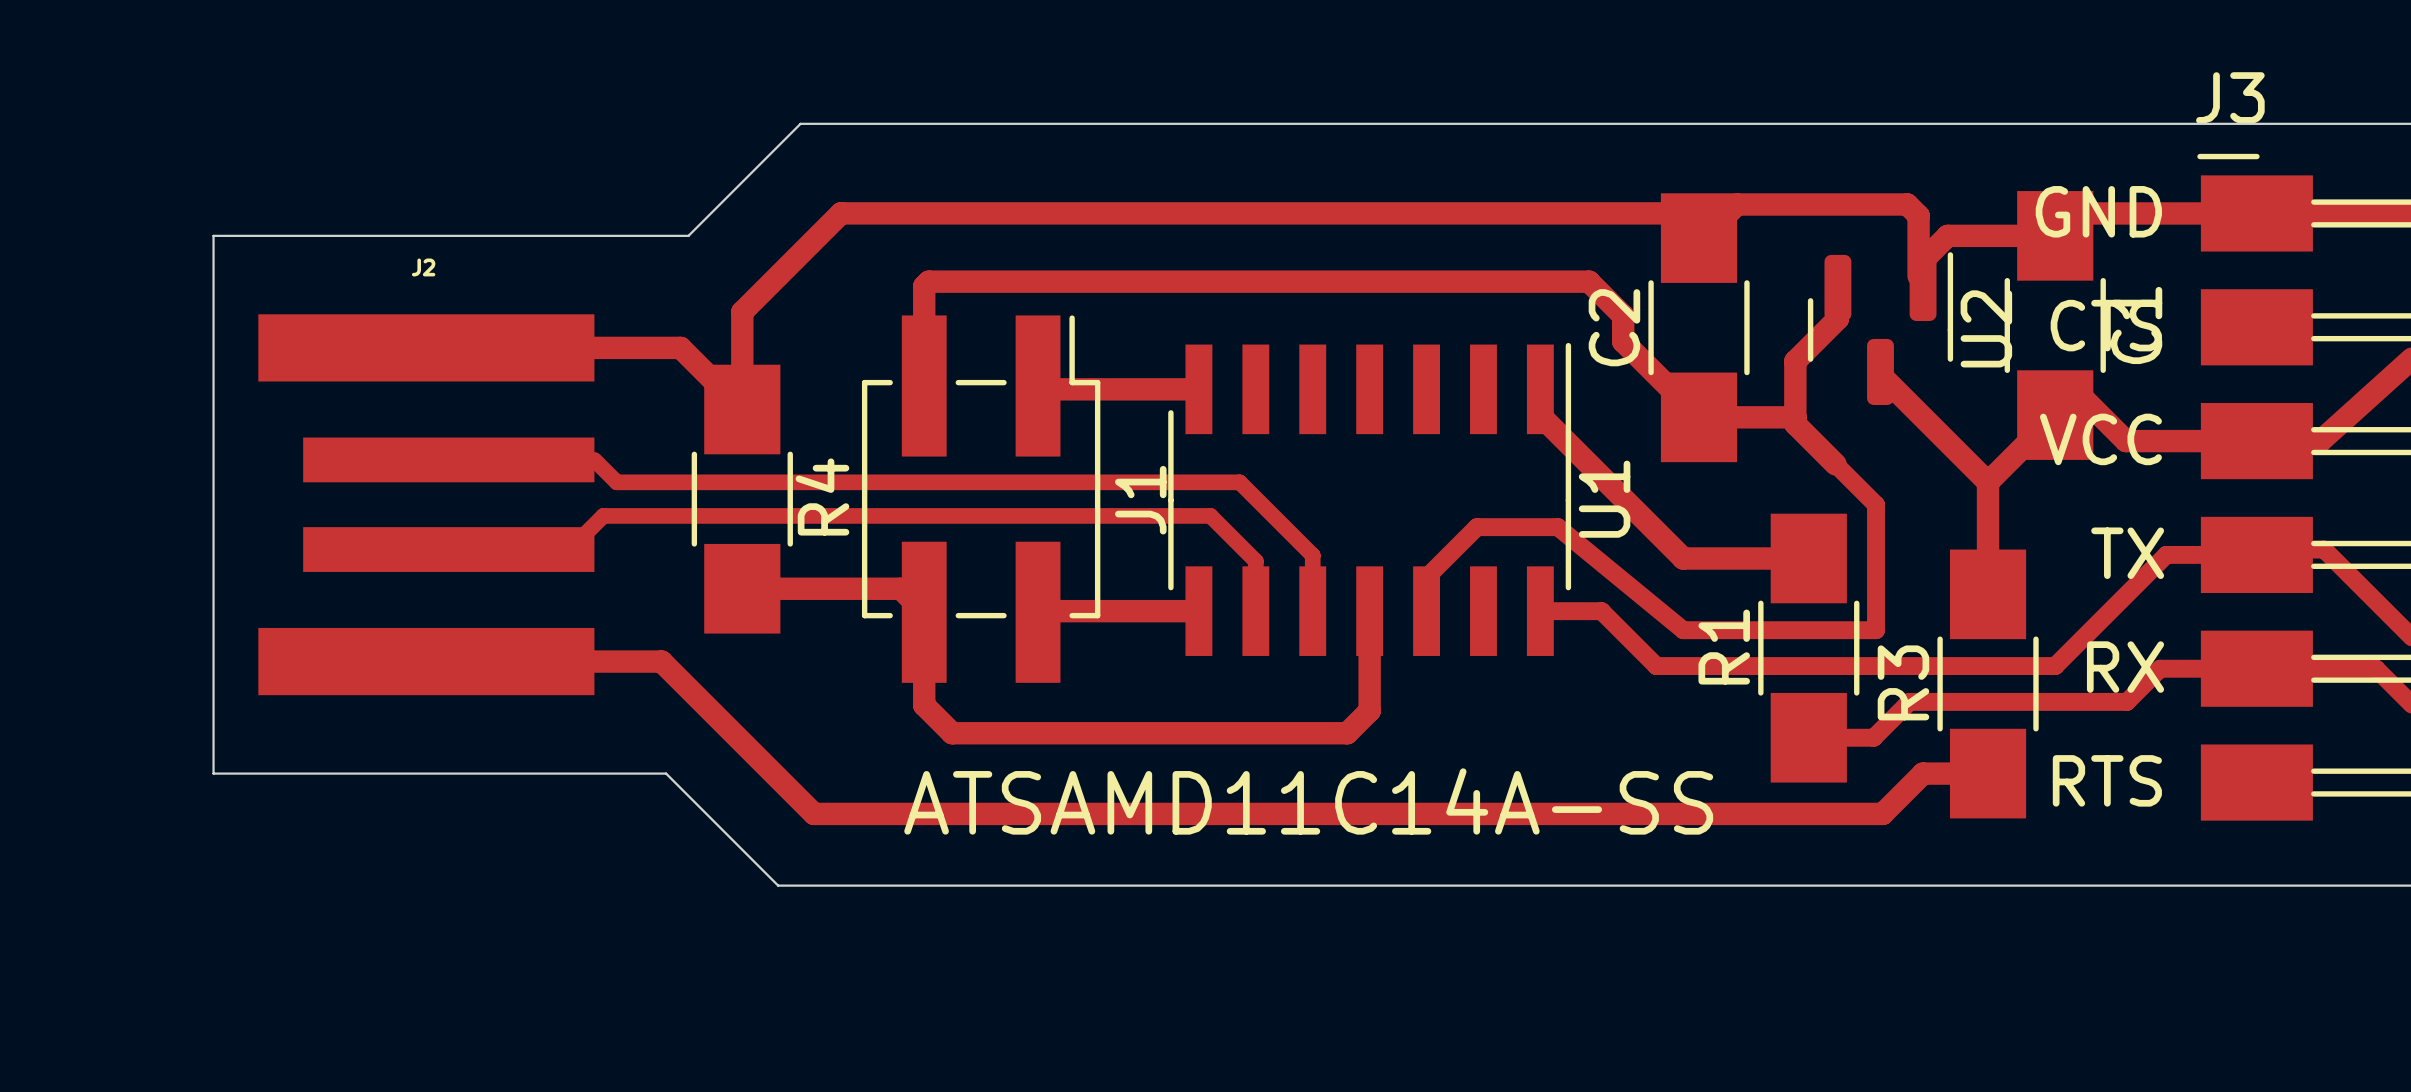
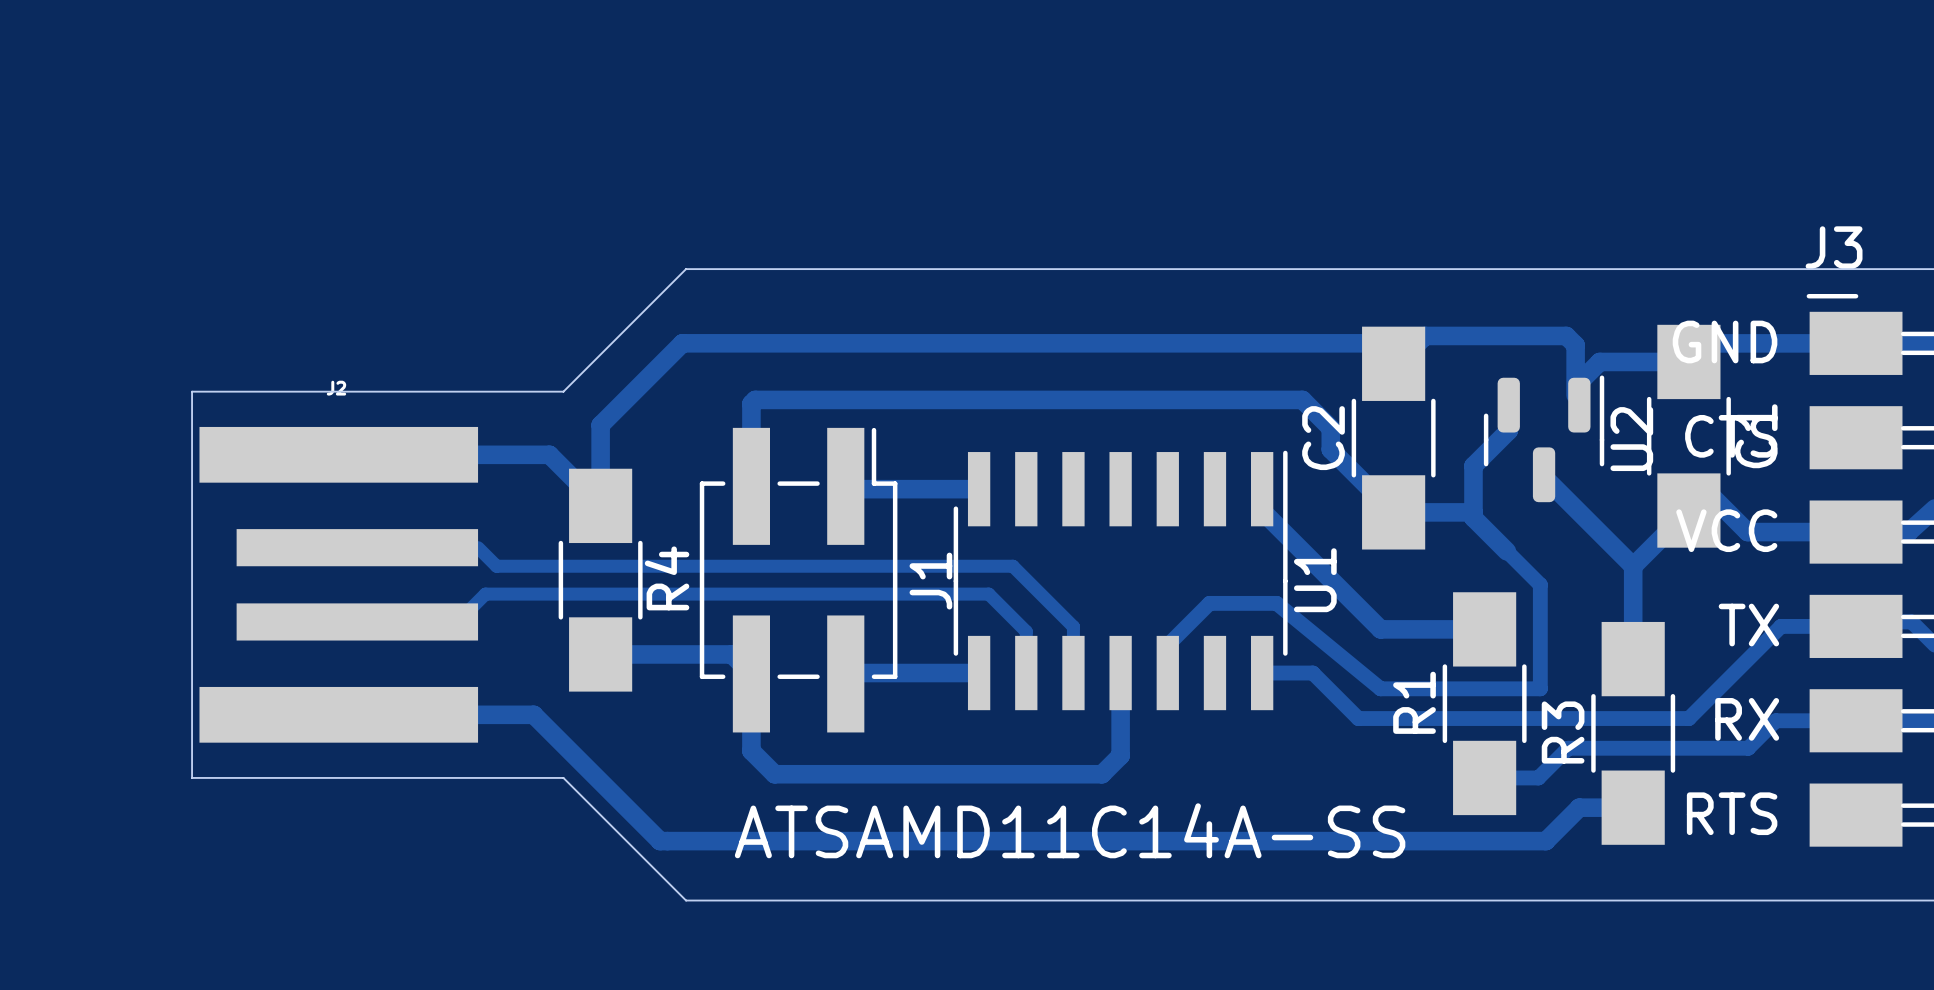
board edge: (845, 123) (800, 123) (688, 235) (213, 235) (213, 773) (666, 773) (778, 885) (845, 885) -> (686, 269) (563, 391) (192, 391) (192, 777) (563, 777) (686, 900)

